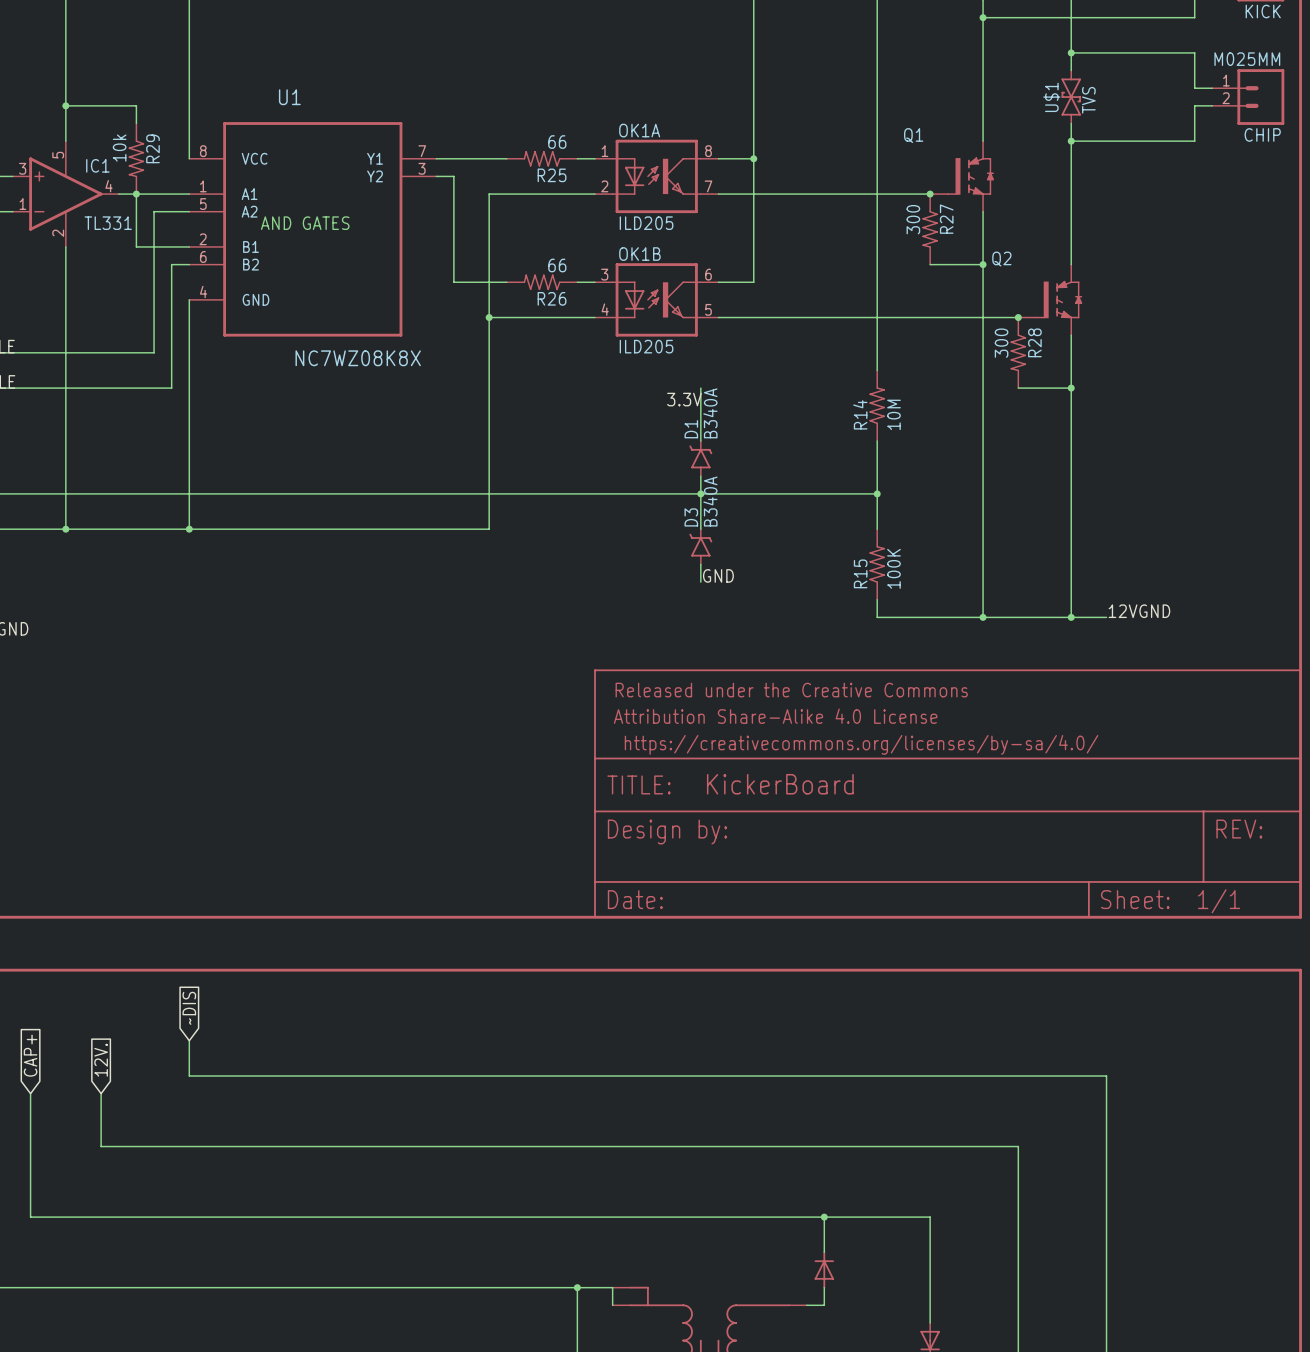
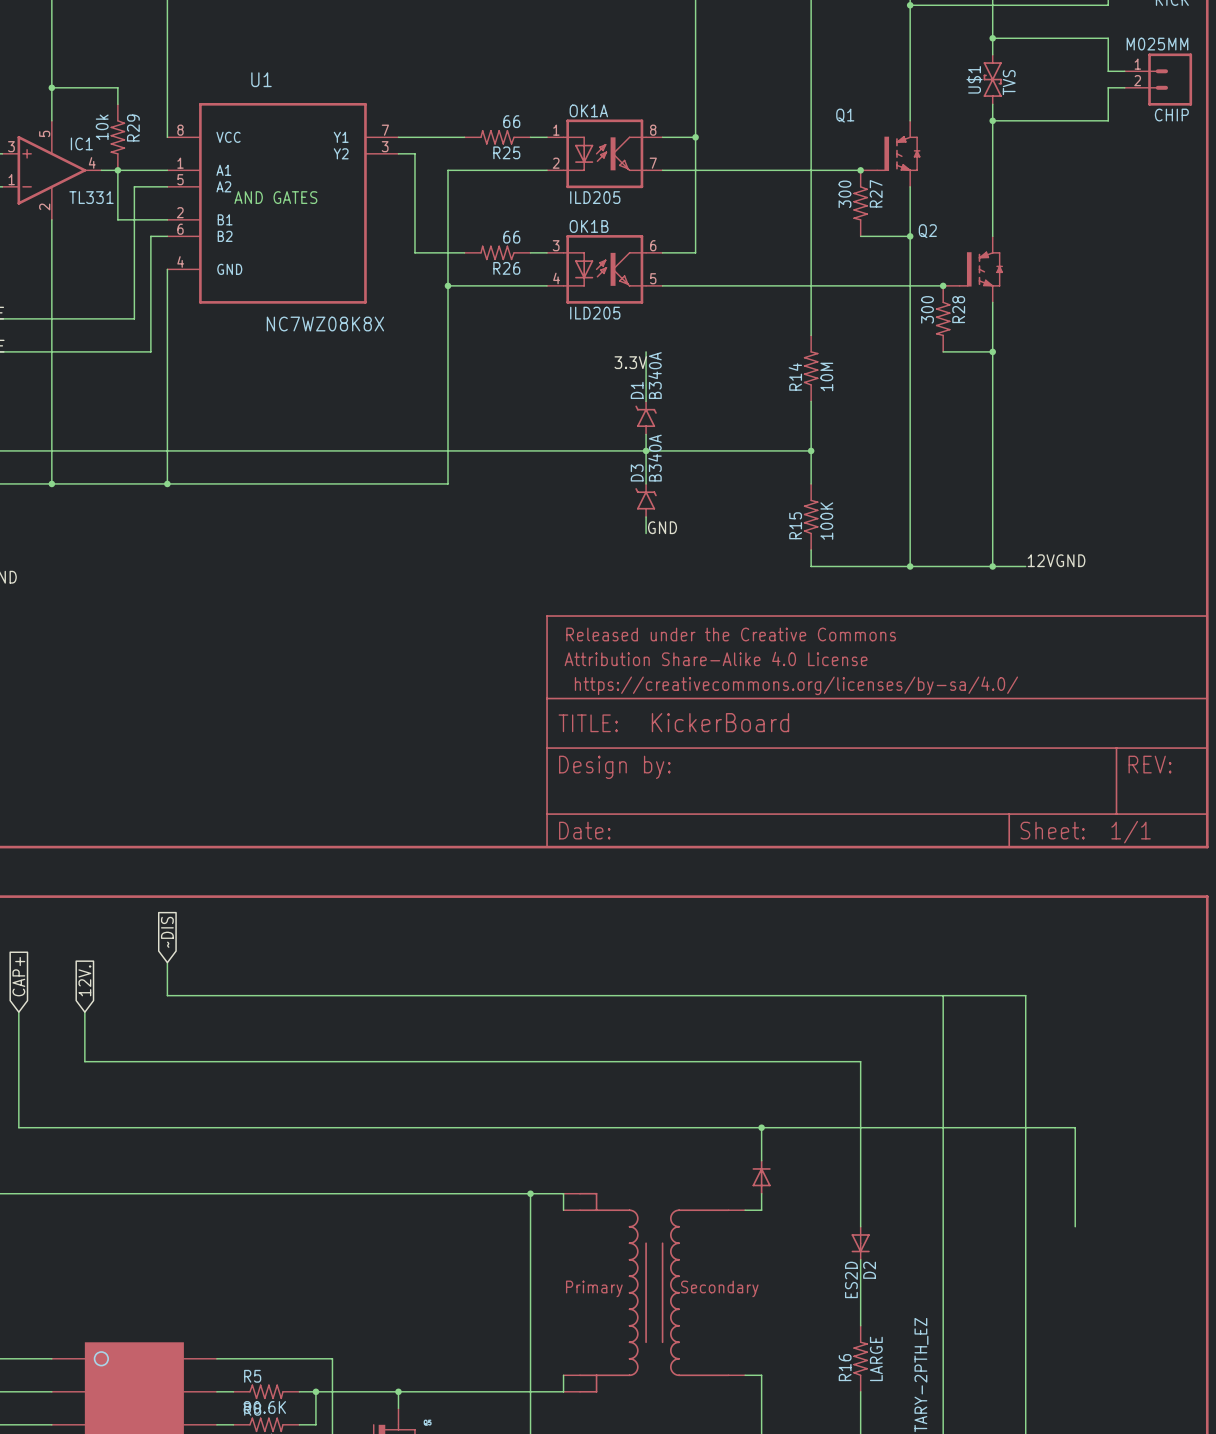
wire: (930, 1146) (1018, 1146) -> (943, 995) (943, 1061)
wire: none -> (860, 1061) (860, 1127) (1075, 1127) (1075, 1226)

